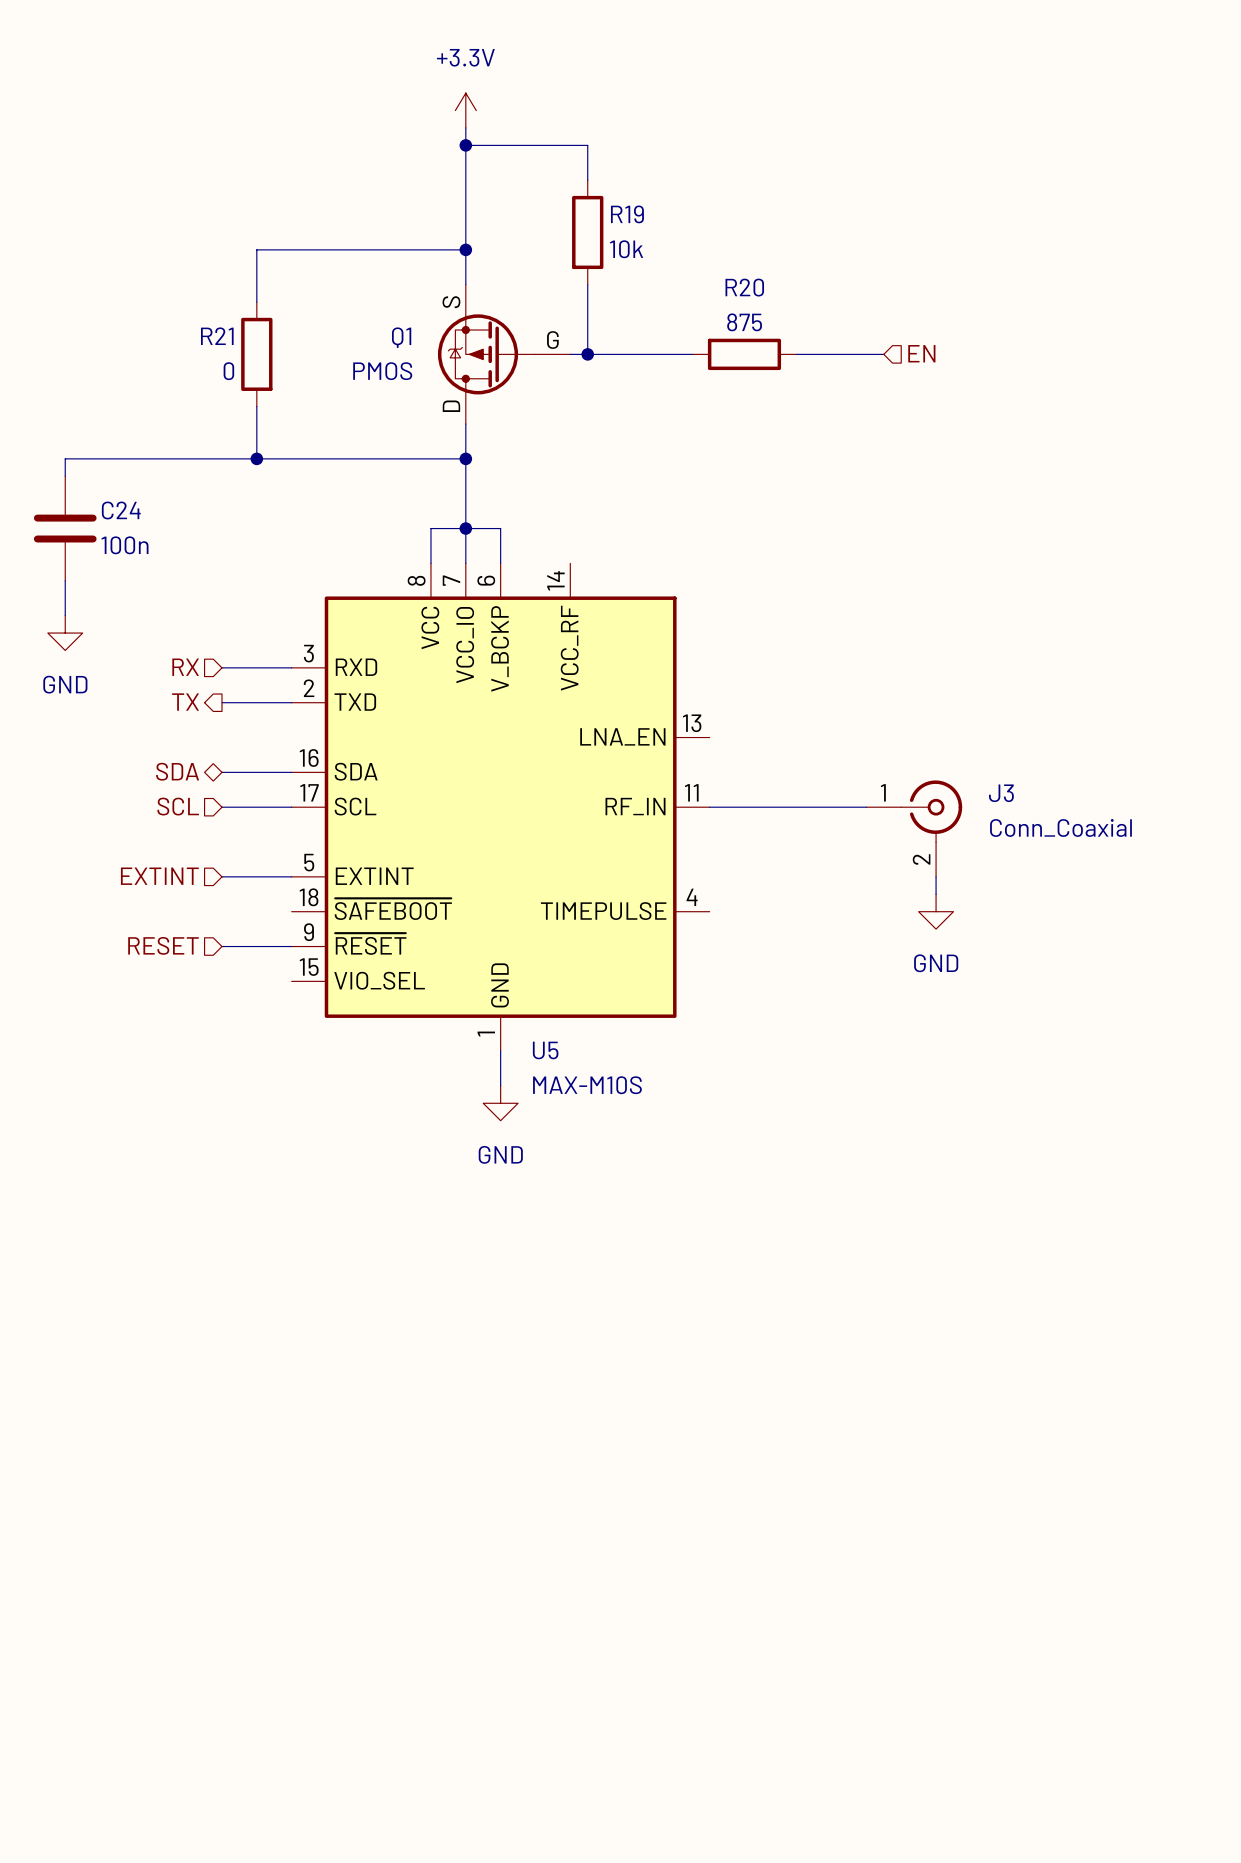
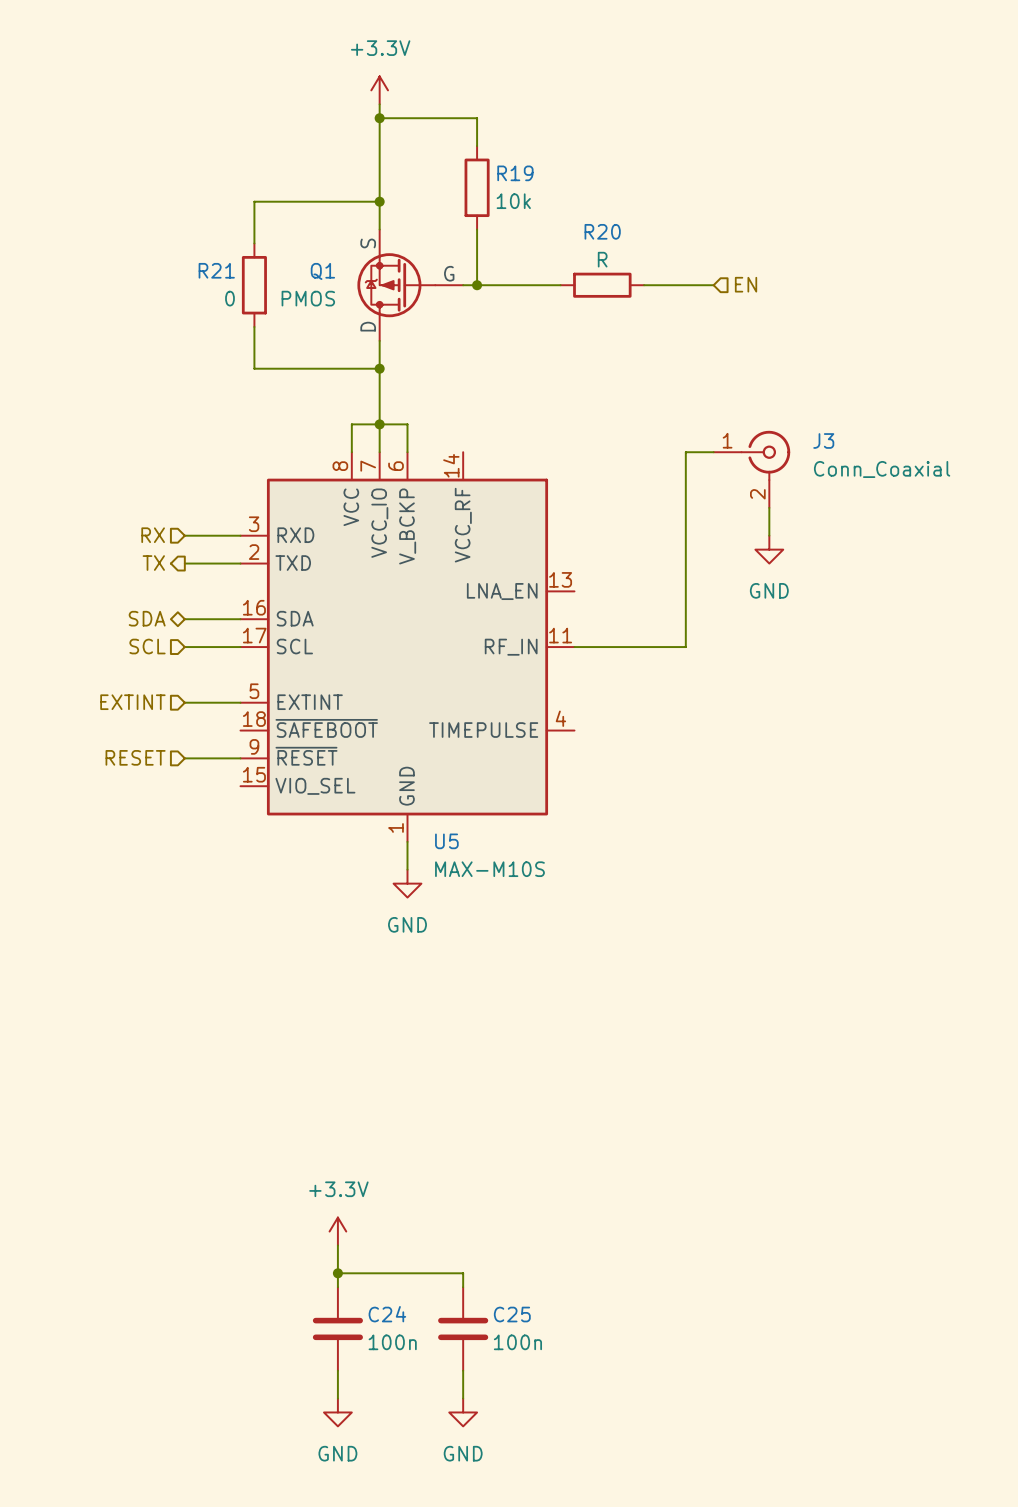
wire: (309, 249) (256, 249) (256, 302) -> (254, 201) (254, 243)
R20 value: 875 (744, 322) -> R (602, 259)
R21 position: (256, 354) -> (254, 285)
wire: (256, 406) (256, 458) -> none
junction: (256, 458) -> none
wire: (309, 458) (65, 458) (65, 476) -> (254, 368) (254, 326)
C24 position: (65, 528) -> (337, 1328)
wire: (65, 580) (65, 615) -> none
power symbol: GND (65, 633) -> none
wire: none -> (769, 507) (769, 535)
wire: (848, 807) (866, 807) -> (685, 647) (685, 452) (713, 452)
J3 position: (914, 828) -> (751, 469)
wire: (936, 876) (936, 894) -> none
power symbol position: GND (936, 911) -> GND (769, 549)
power symbol: none -> +3.3V (337, 1231)
wire: none -> (337, 1245) (337, 1287)
wire: none -> (337, 1273) (463, 1273) (463, 1287)
junction: none -> (337, 1273)
C25: none -> 100n (463, 1328)
wire: none -> (337, 1370) (337, 1398)
wire: none -> (463, 1370) (463, 1398)
power symbol: none -> GND (337, 1412)
power symbol: none -> GND (463, 1412)

